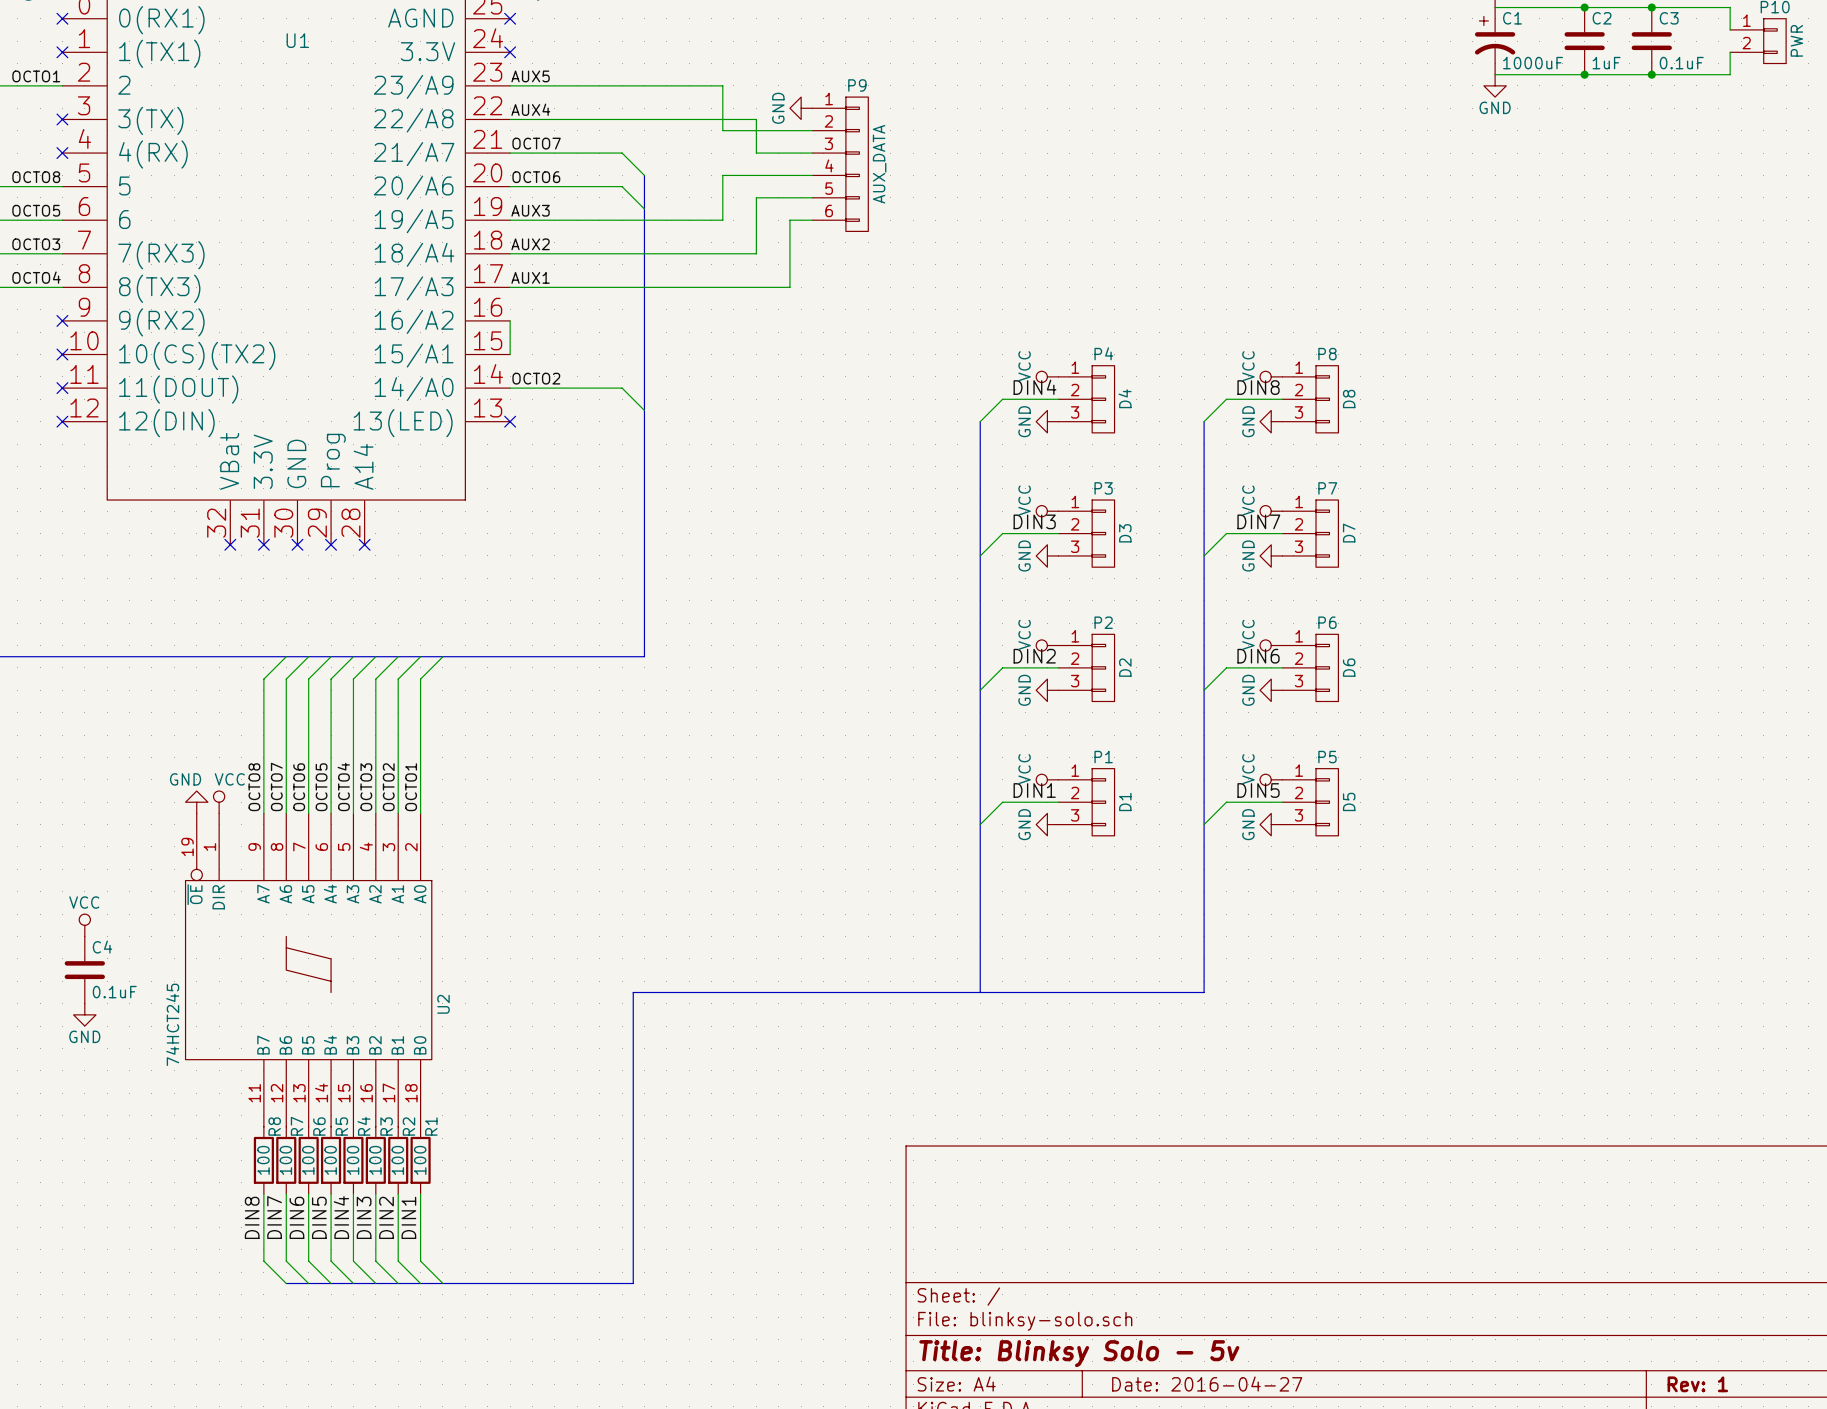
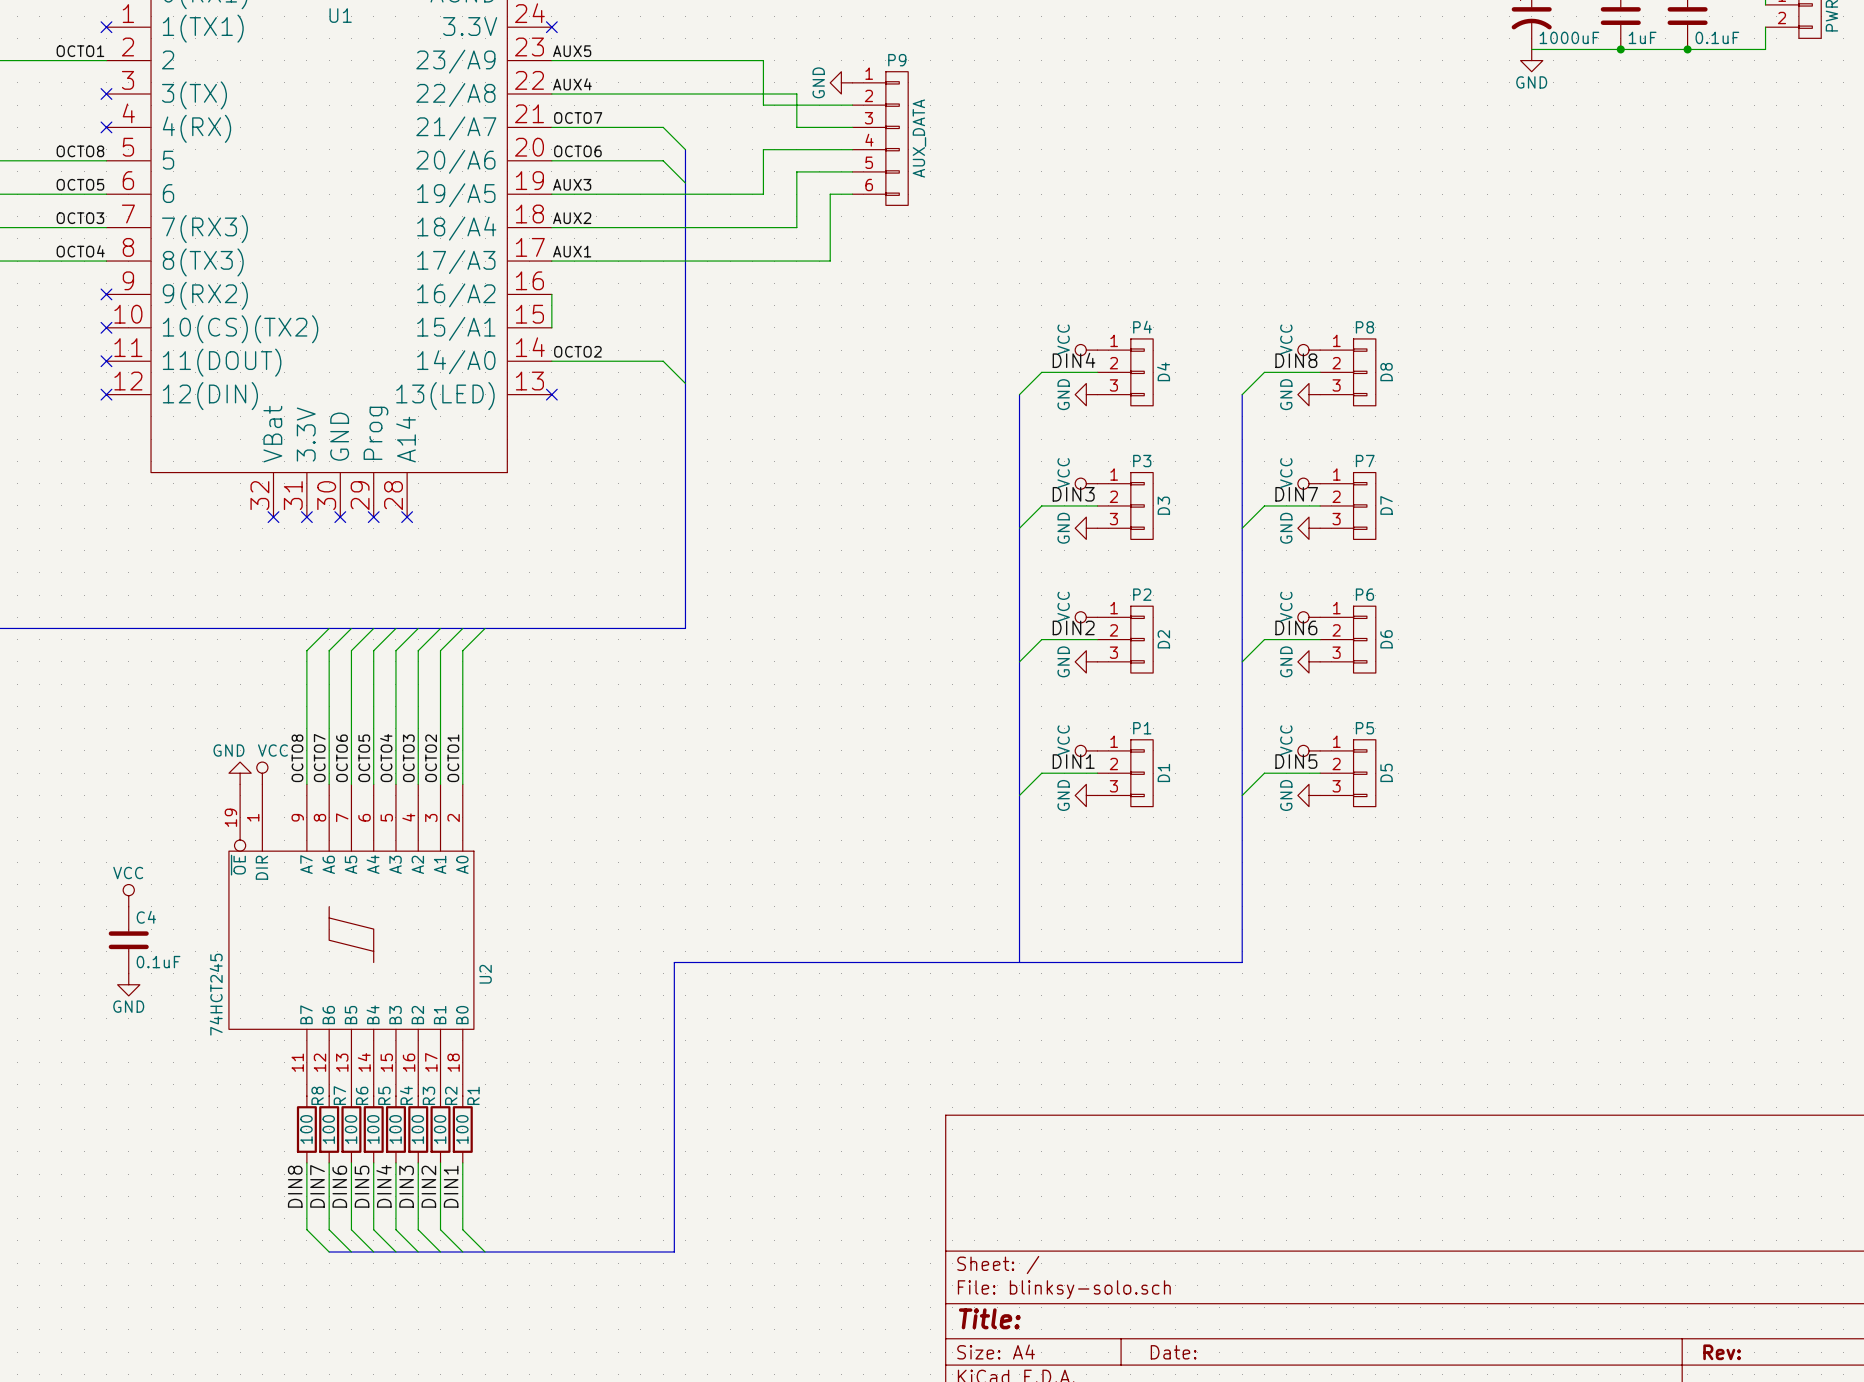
title block: Title: Blinksy Solo - 5v (1079, 1353) -> Title: (989, 1318)
title block: Date: 2016-04-27 (1207, 1384) -> Date: (1173, 1352)
title block: Rev: 1 (1697, 1384) -> Rev: (1722, 1352)

